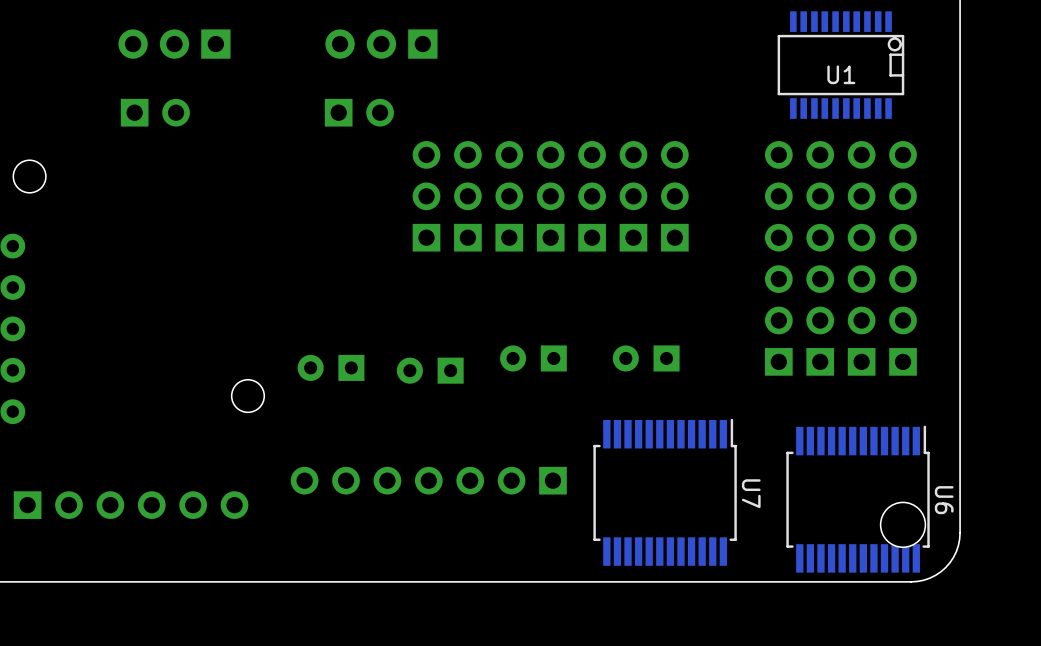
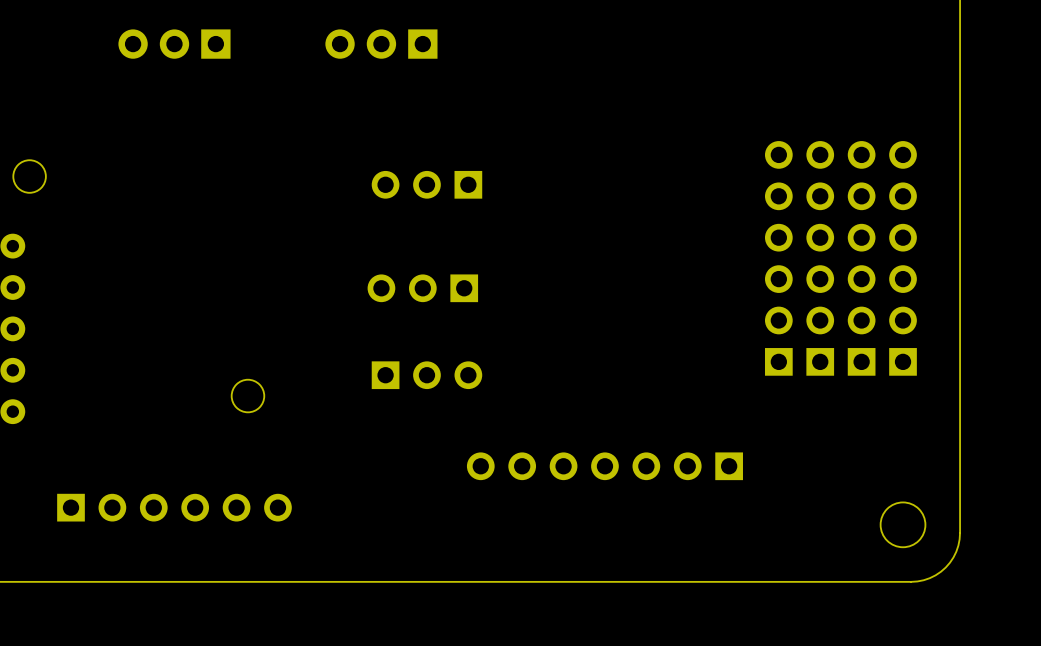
U1: (840, 65) -> none
part: (155, 112) -> none
part: (359, 112) -> none
part rotation: 0° (426, 196) -> 90° counterclockwise (426, 184)
part: (467, 196) -> none
part: (509, 196) -> none
part: (550, 196) -> none
part: (592, 196) -> none
part: (633, 196) -> none
part: (674, 196) -> none
part: none -> (422, 288)
part footprint: [396, 357, 464, 384] -> [371, 361, 483, 390]
part: (533, 358) -> none
part: (646, 358) -> none
part: (331, 367) -> none
part position: (428, 480) -> (604, 466)
U7: (665, 492) -> none
U6: (858, 499) -> none
part position: (131, 505) -> (174, 507)

